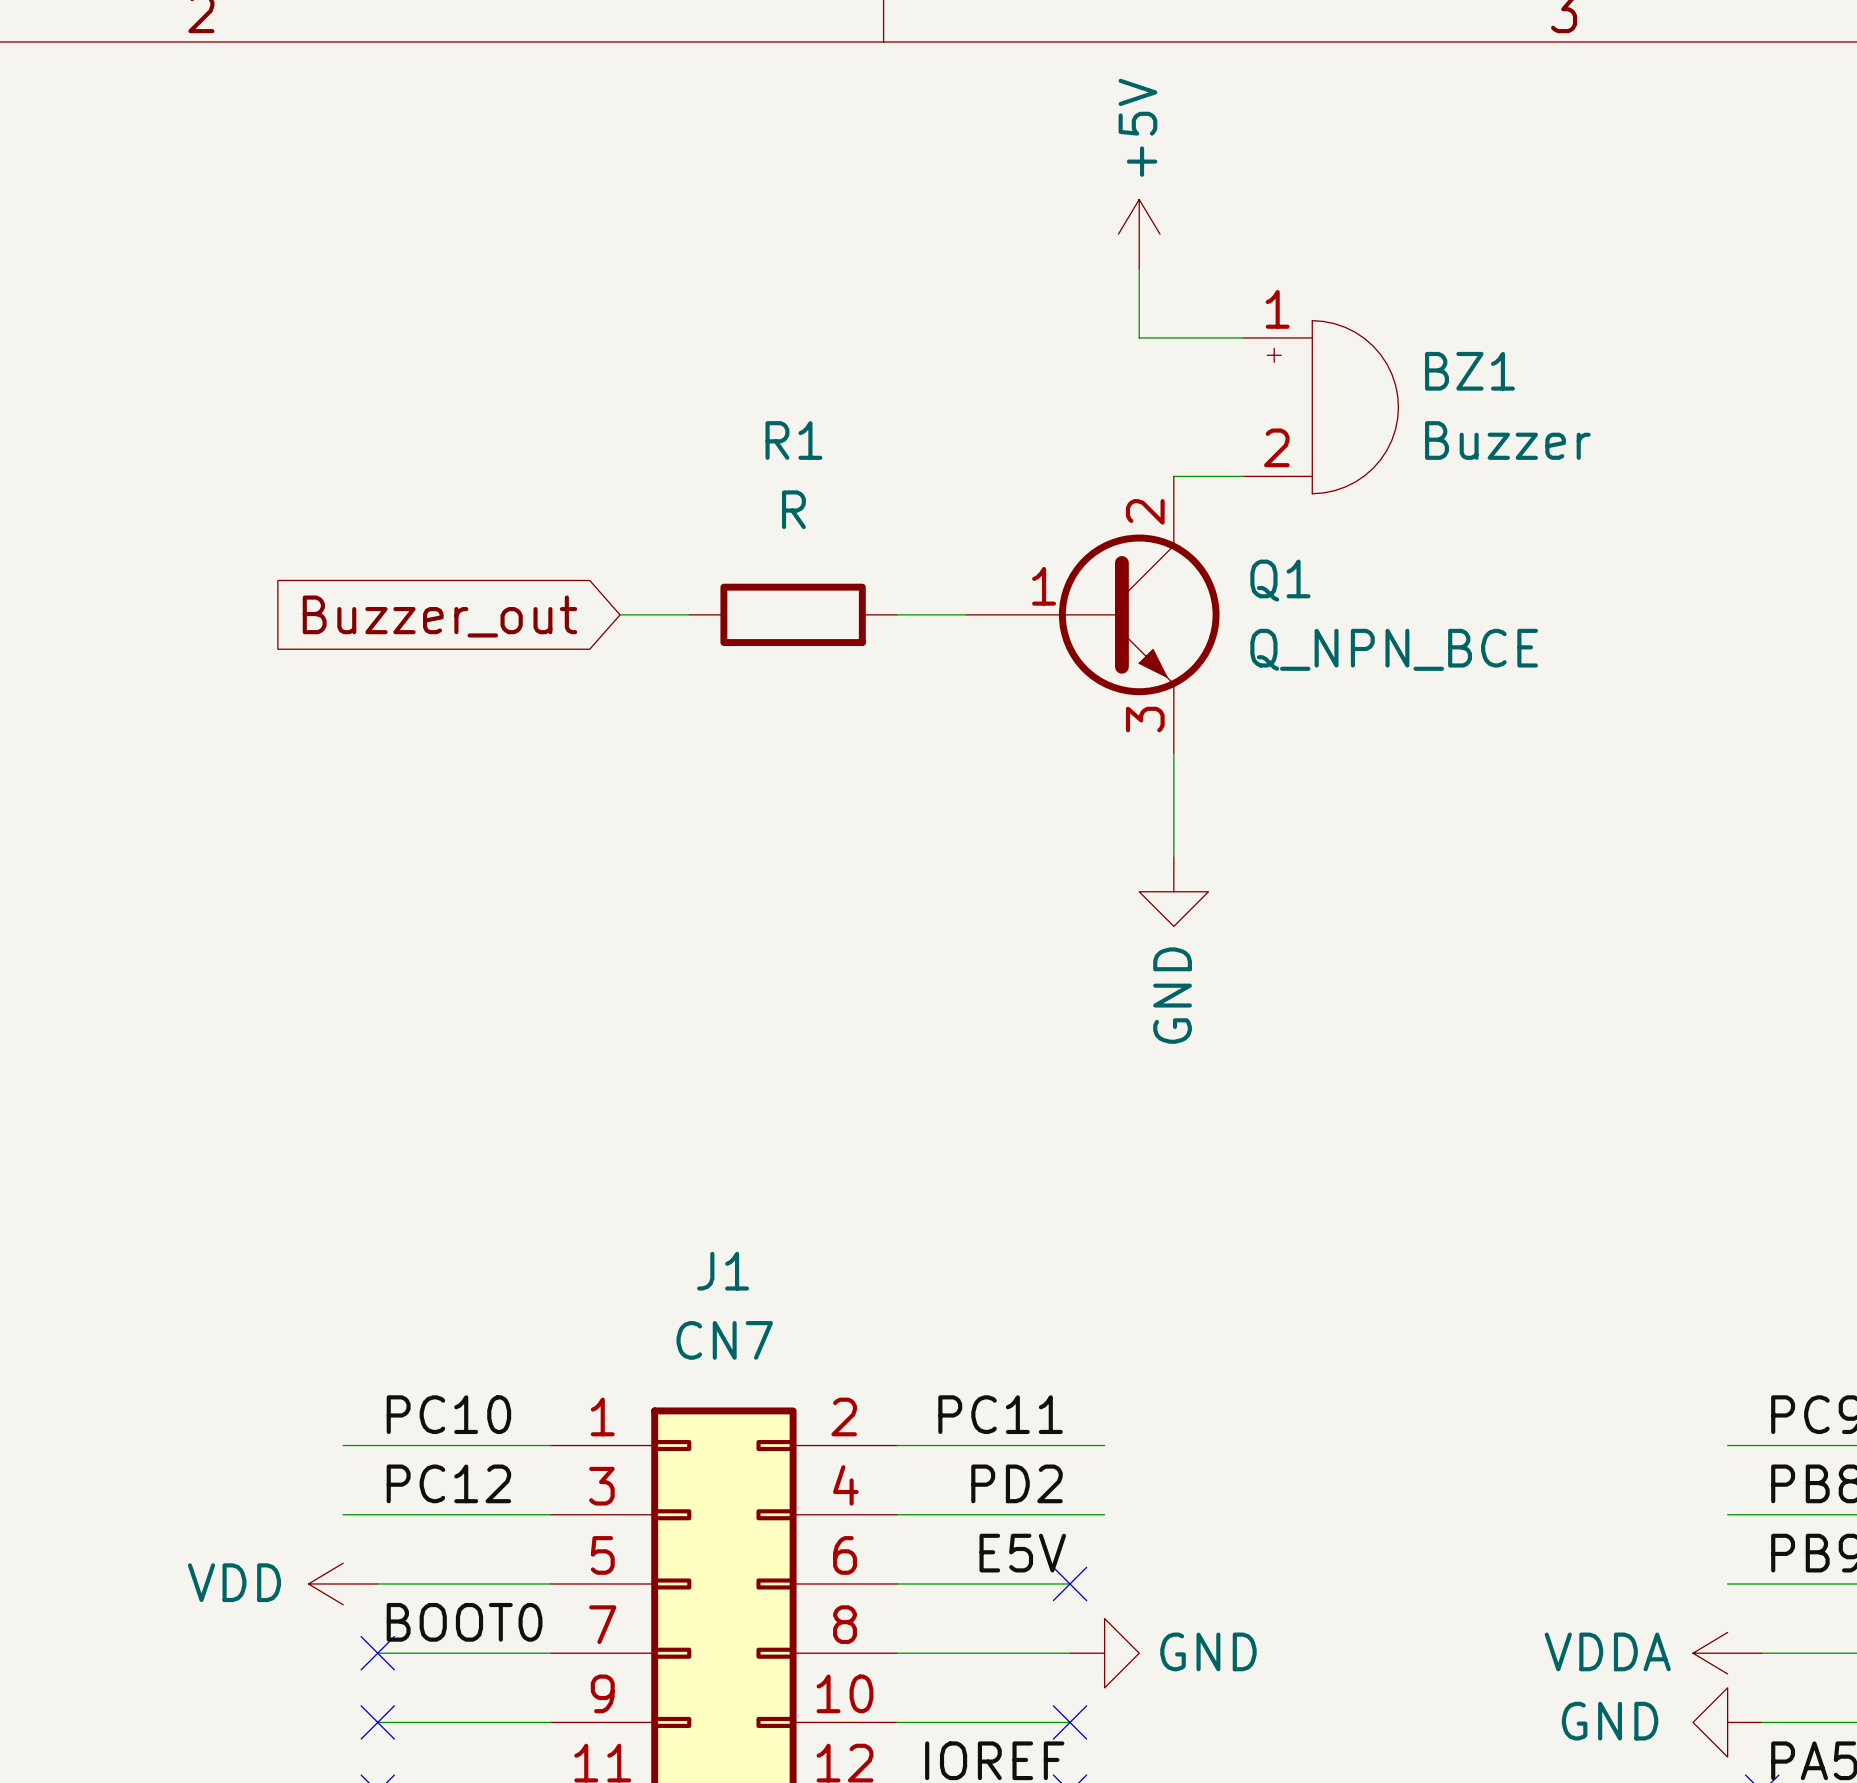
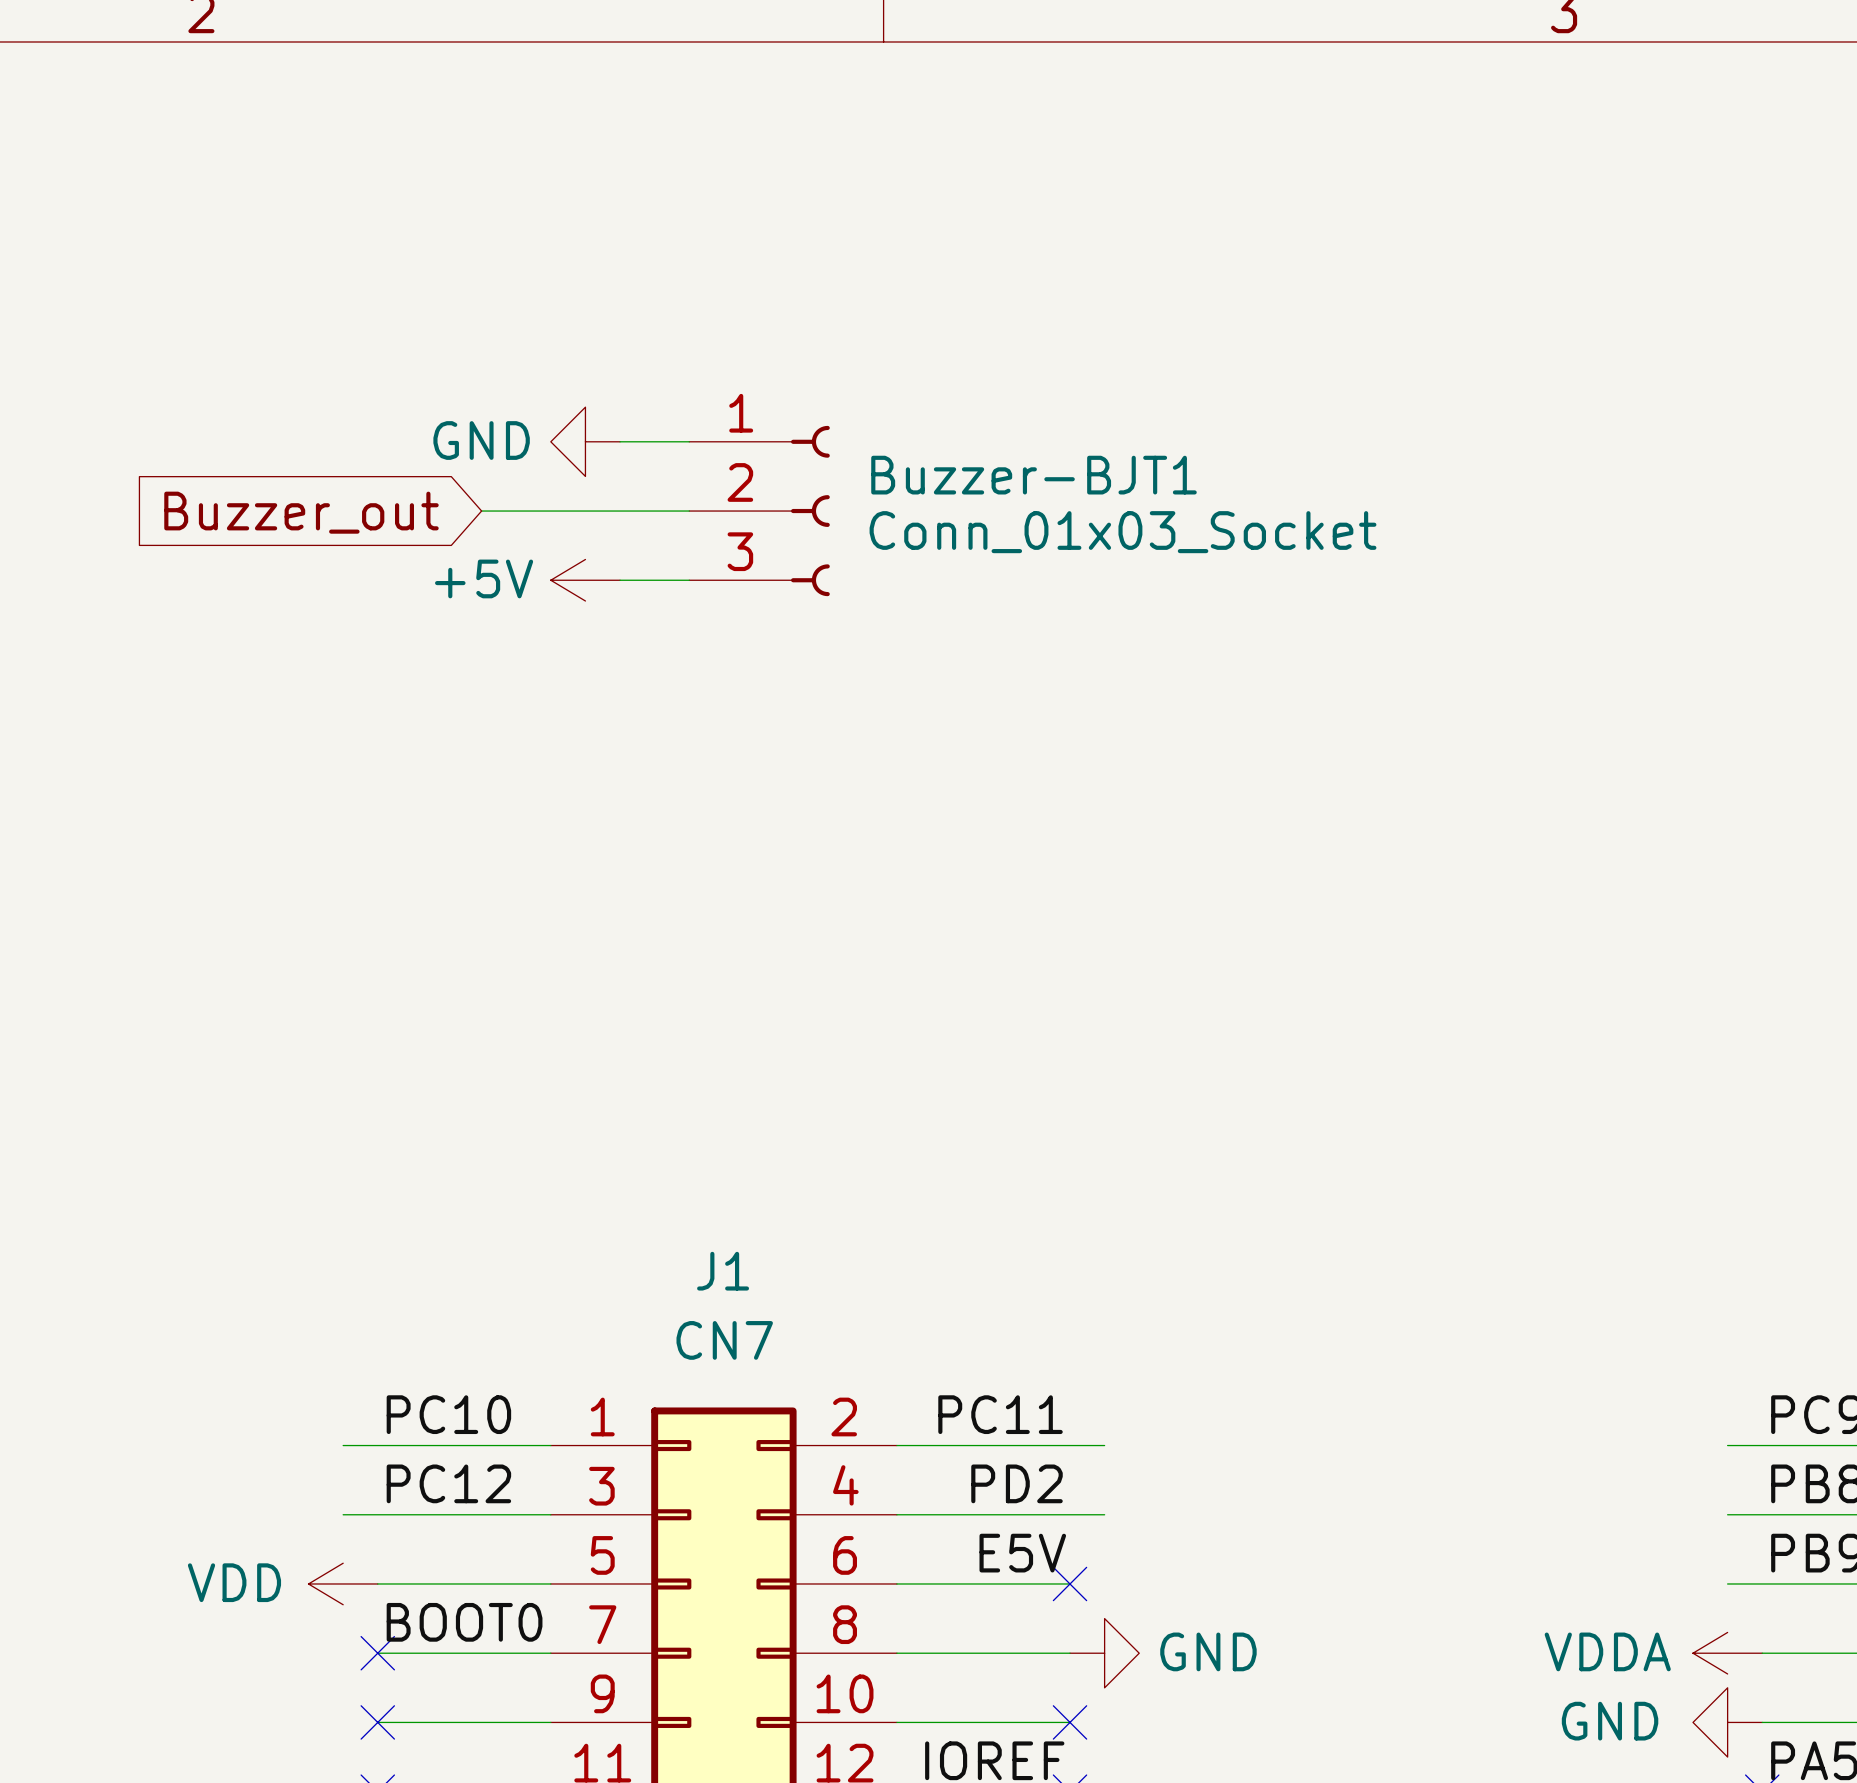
power symbol rotation: 0° (1139, 234) -> 90° counterclockwise (585, 580)
power symbol position: +5V (1139, 234) -> +5V (585, 580)
wire: (1139, 268) (1139, 337) (1243, 337) -> none
BZ1: Buzzer (1320, 407) -> none
power symbol: none -> GND (585, 441)
wire: (1173, 476) (1243, 476) -> none
wire: none -> (481, 511) (689, 511)
Buzzer-BJT1: none -> Conn_01x03_Socket (759, 511)
wire: (620, 614) (689, 614) -> (620, 580) (689, 580)
R1: R (793, 614) -> none
wire: (896, 614) (966, 614) -> (620, 441) (689, 441)
Q1: Q_NPN_BCE (1092, 614) -> none
global label position: Buzzer_out (439, 616) -> Buzzer_out (301, 512)
wire: (1173, 753) (1173, 857) -> none
power symbol: GND (1173, 891) -> none

